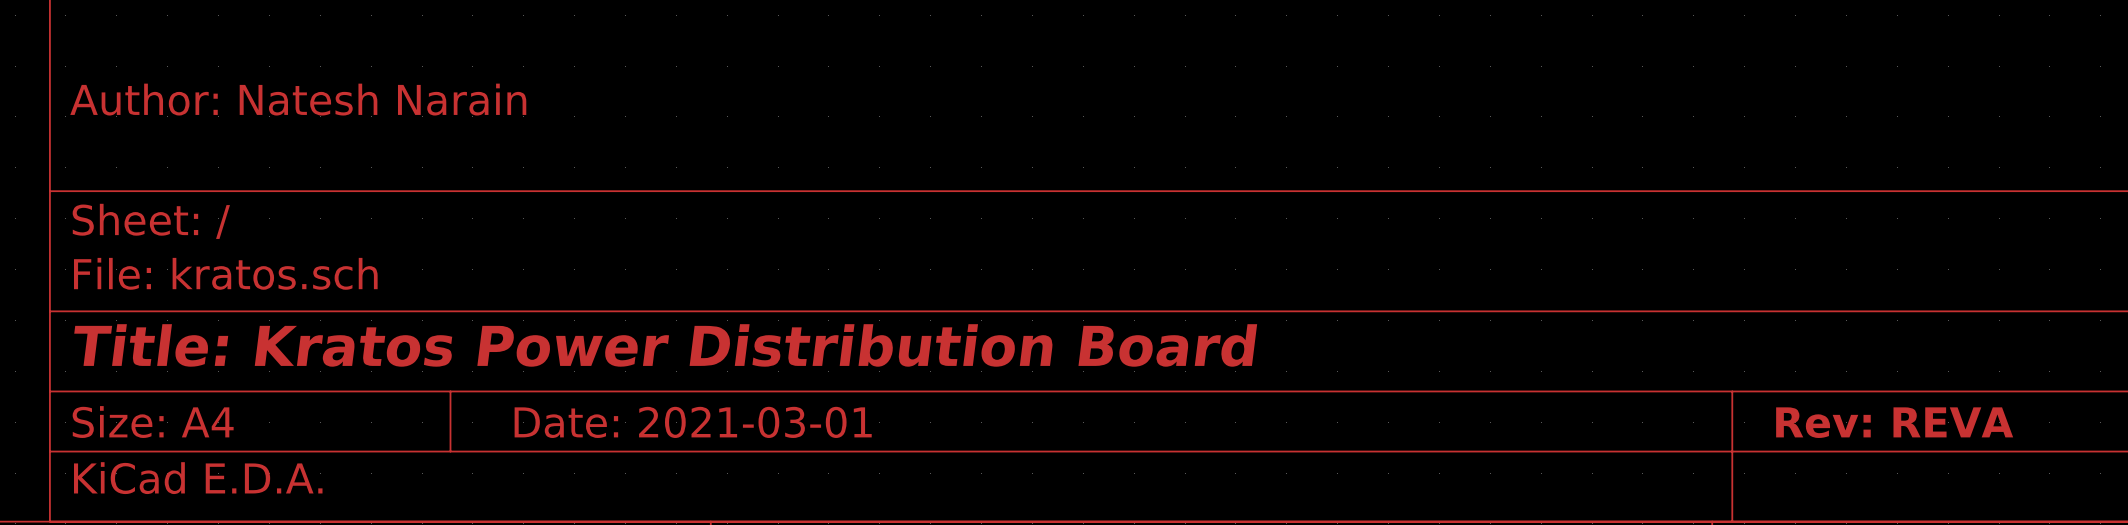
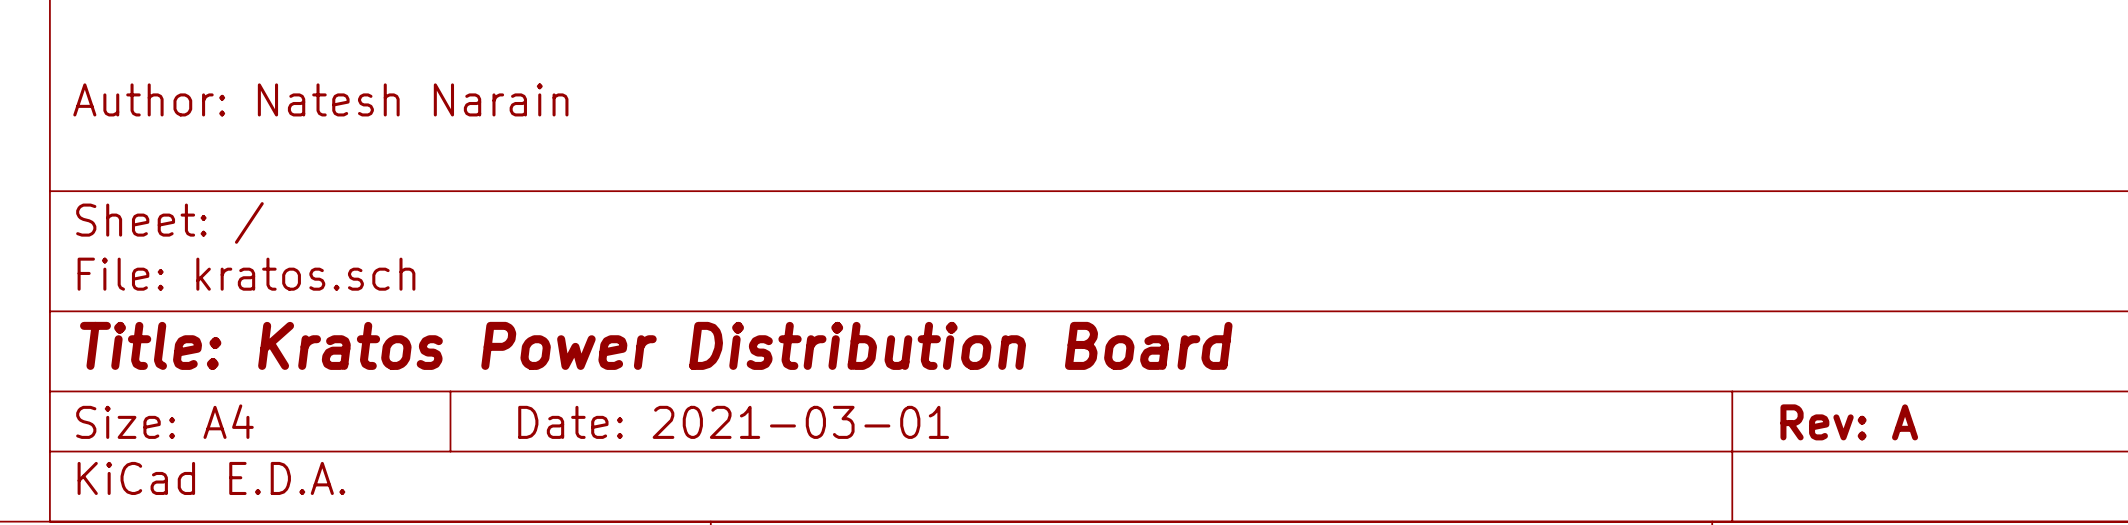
title block: Rev: REVA (1894, 422) -> Rev: A (1849, 422)

